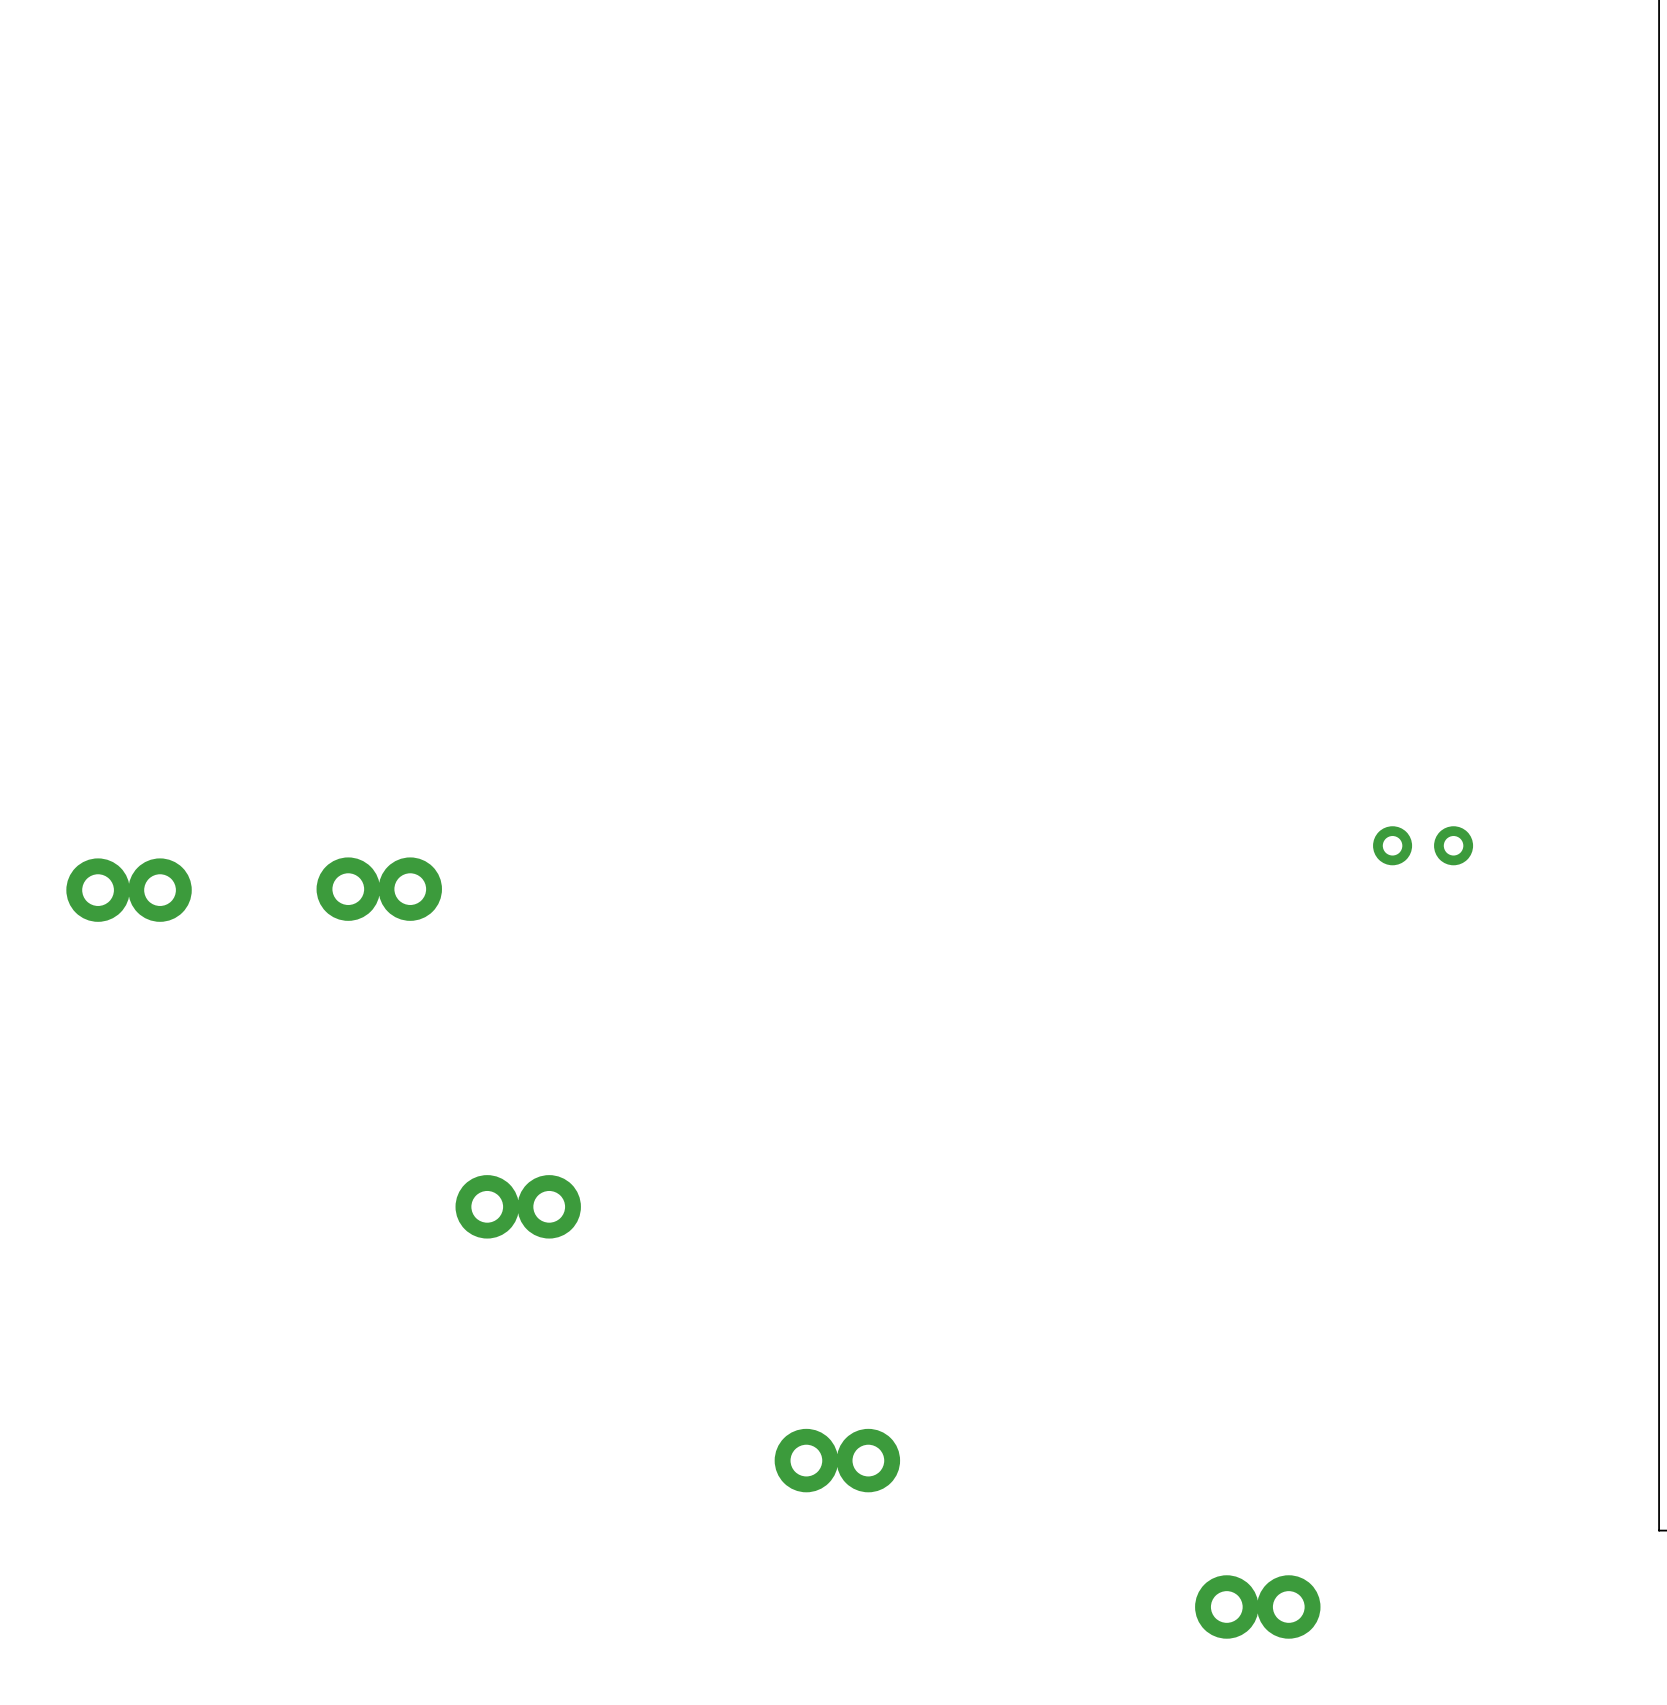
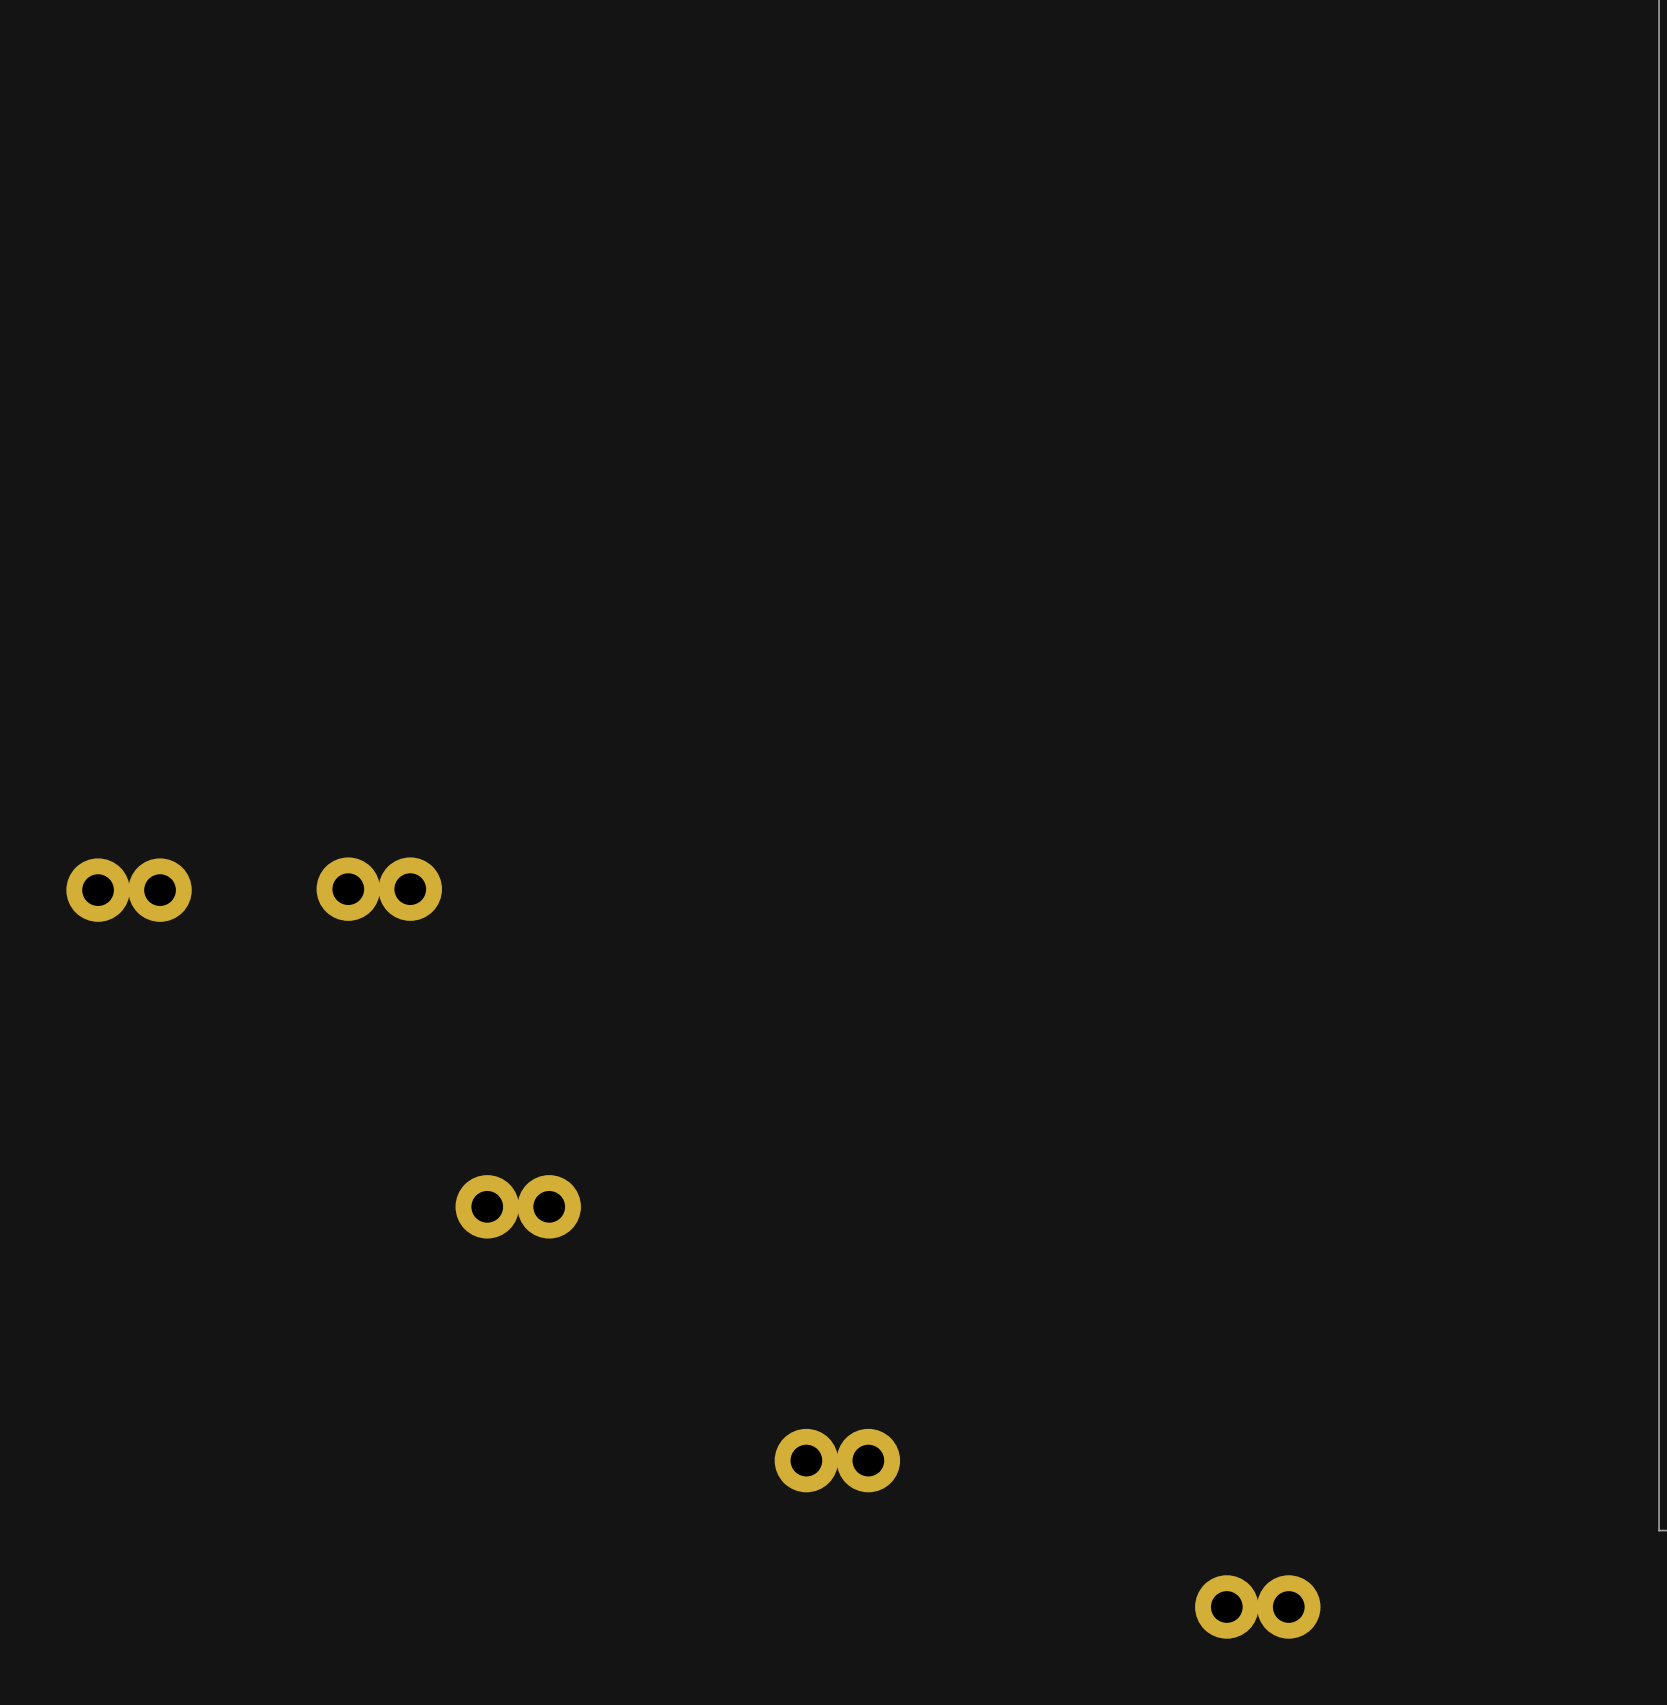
part: (1423, 845) -> none

